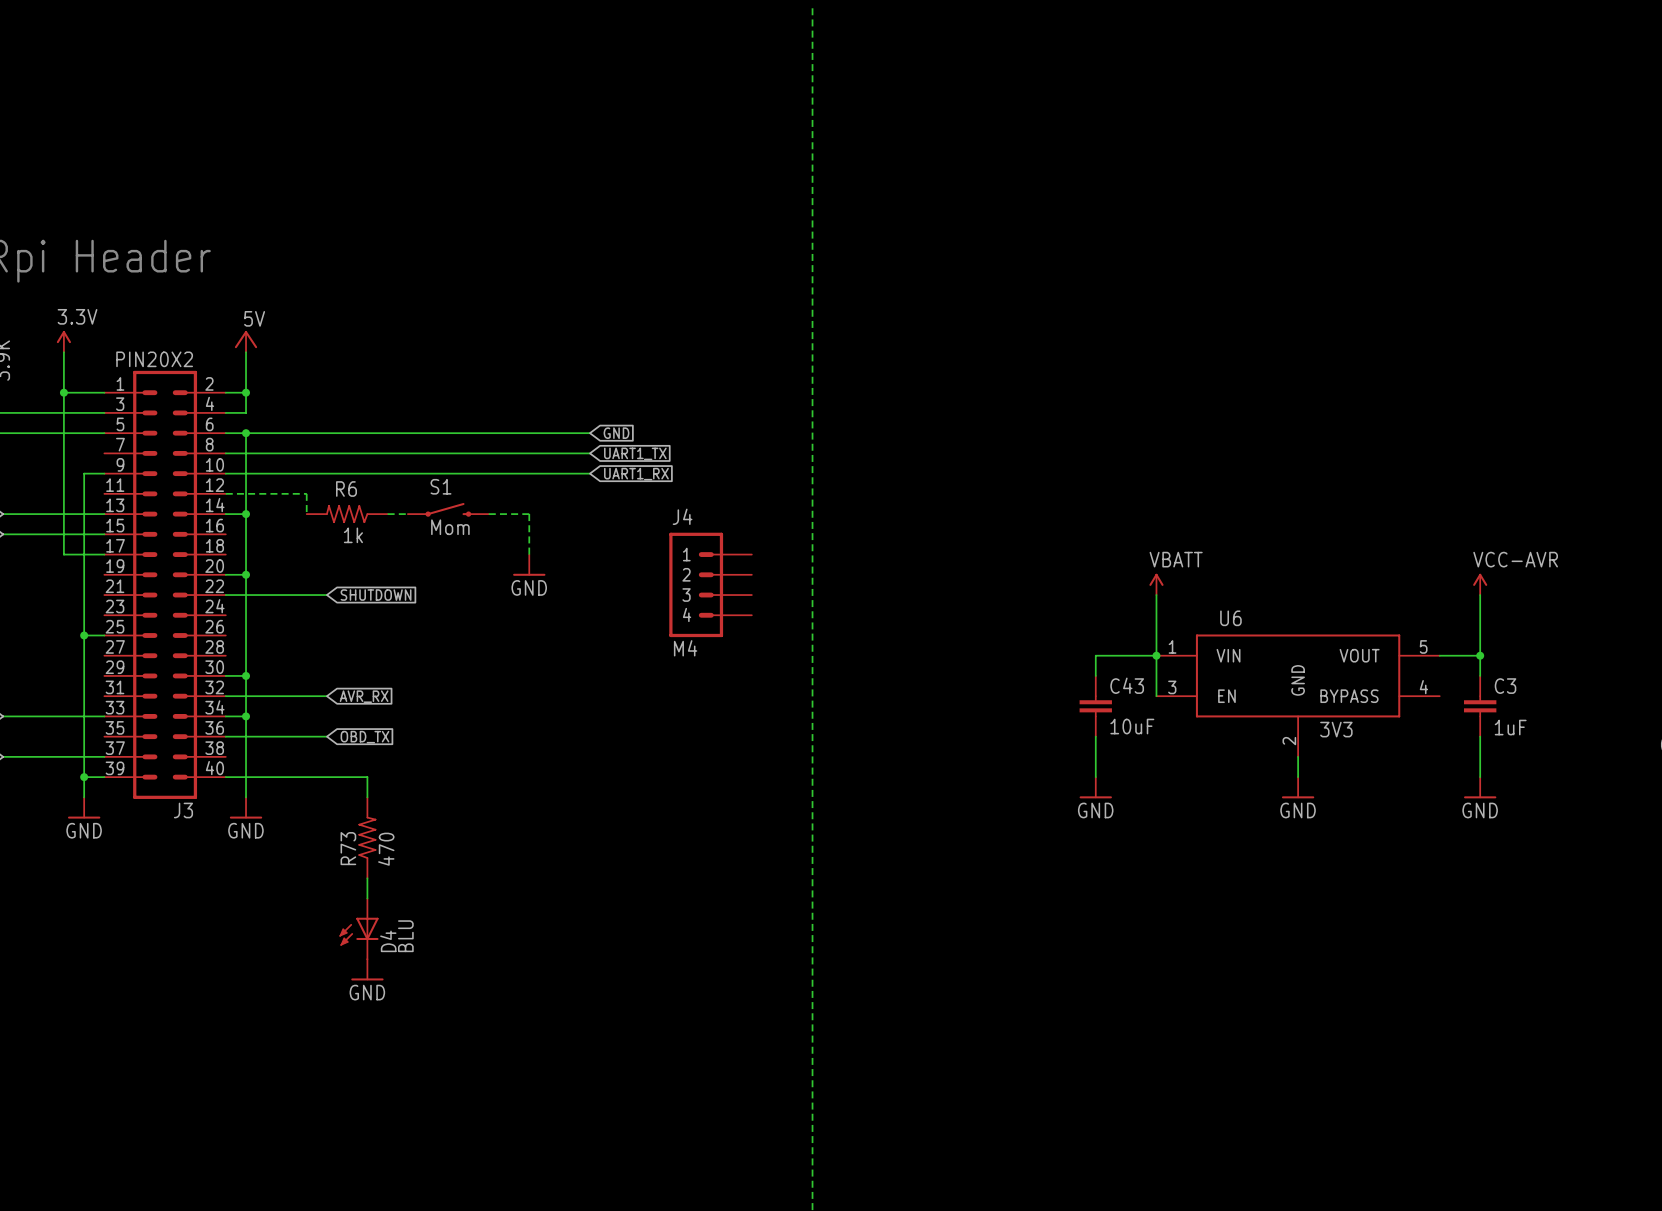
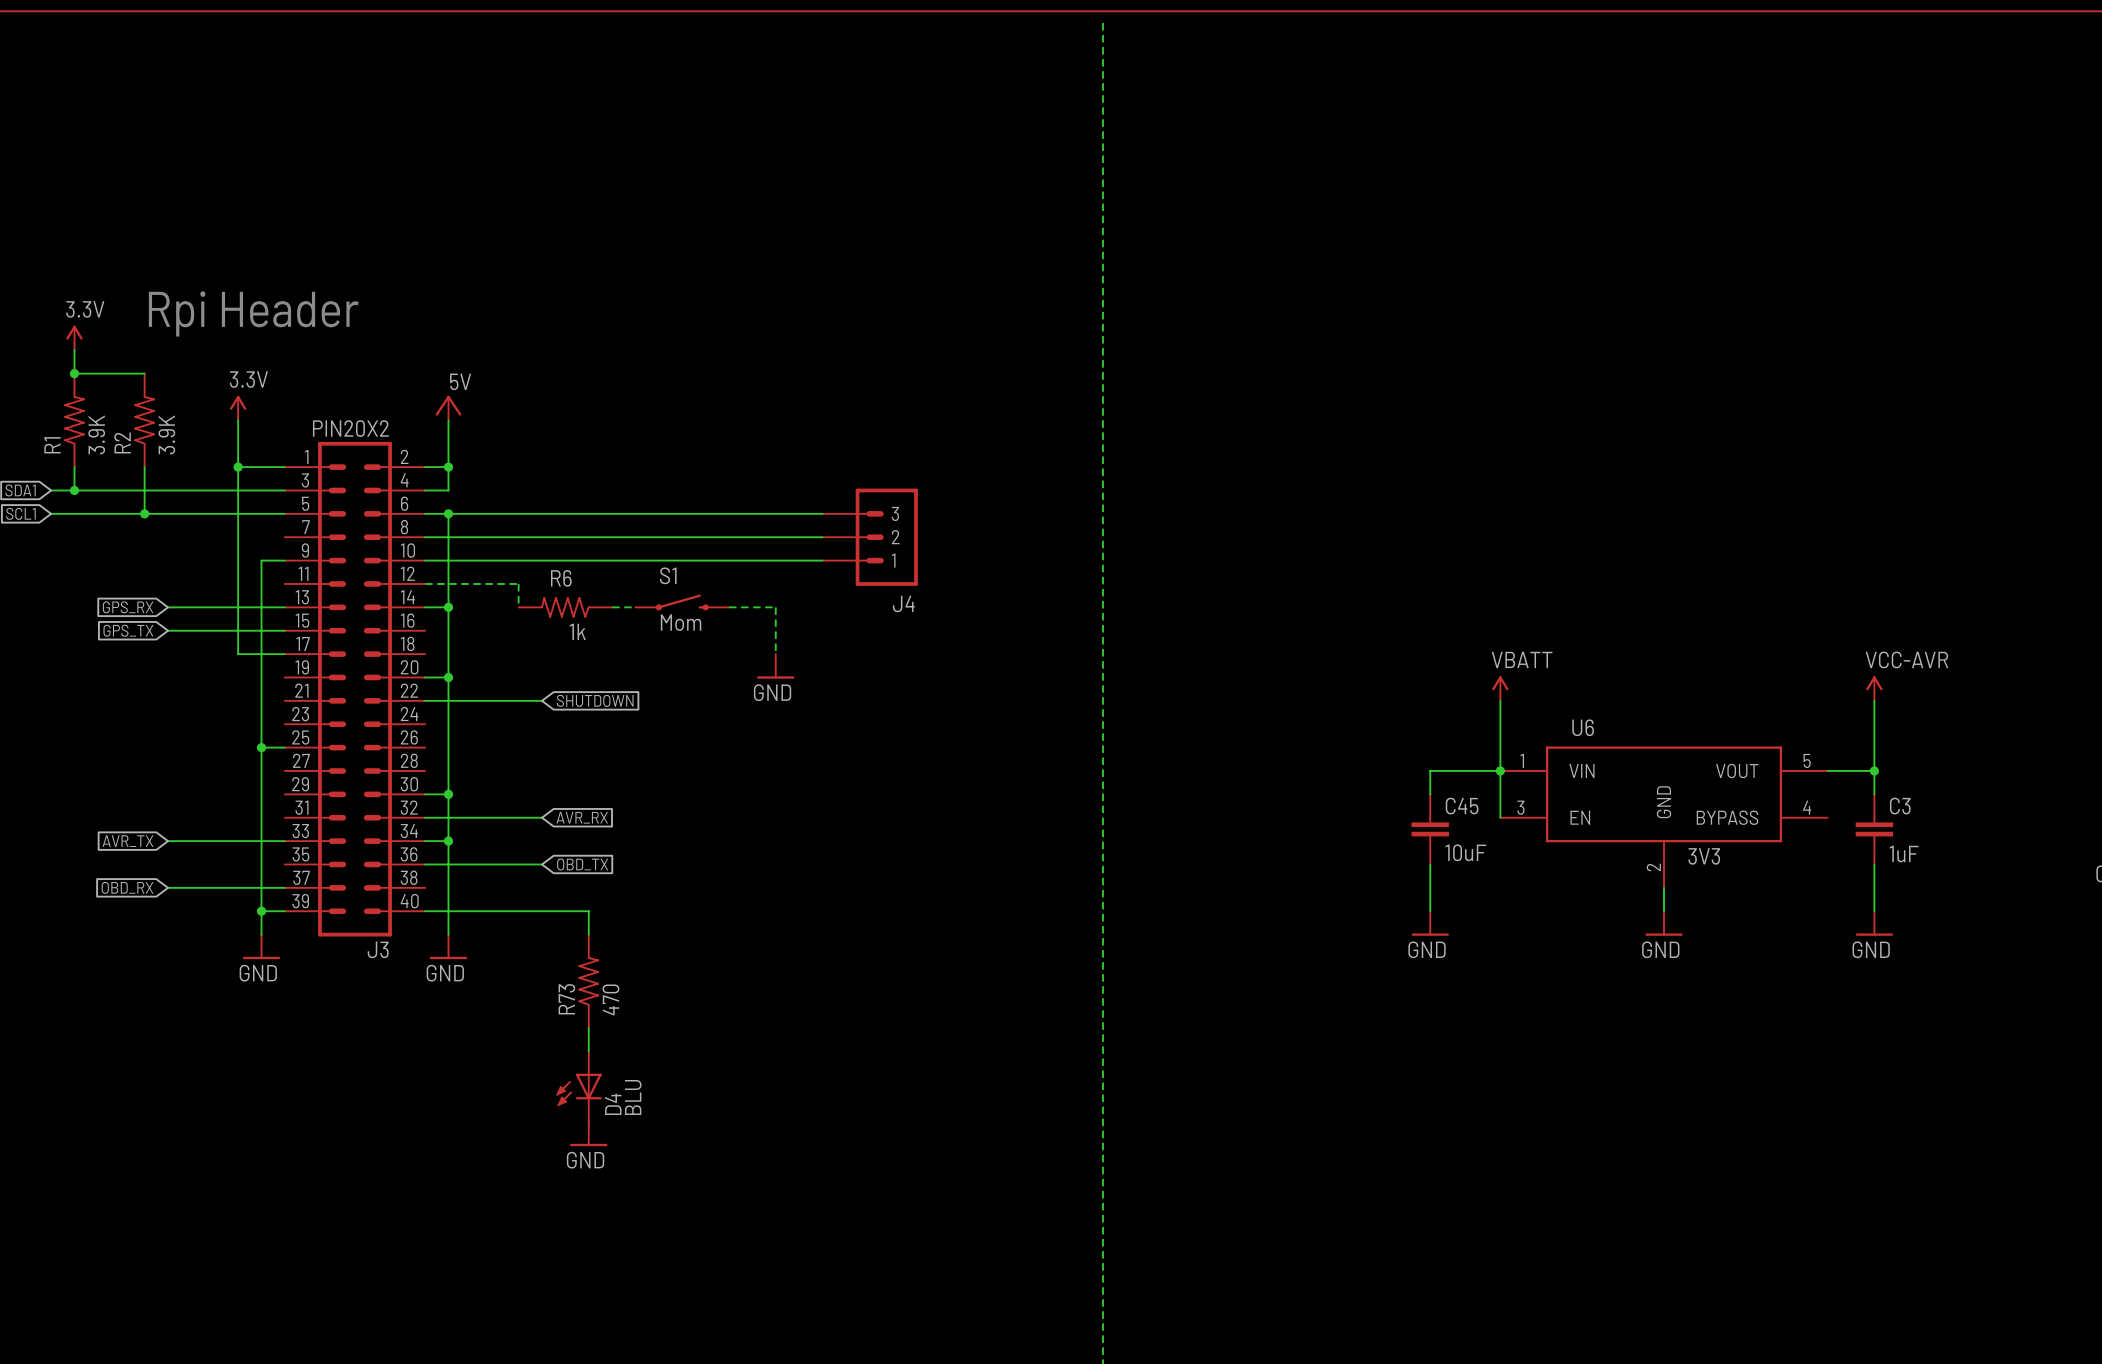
global label: GND (616, 433) -> none
global label: UART1_TX (635, 453) -> none
global label: UART1_RX (636, 474) -> none
J4 name position: J4 (682, 516) -> J4 (903, 603)
J4 symbol: [669, 532, 752, 638] -> [822, 488, 918, 586]
J4 value: M4 (685, 648) -> none
C43 name: C43 (1127, 685) -> C45 (1462, 806)

